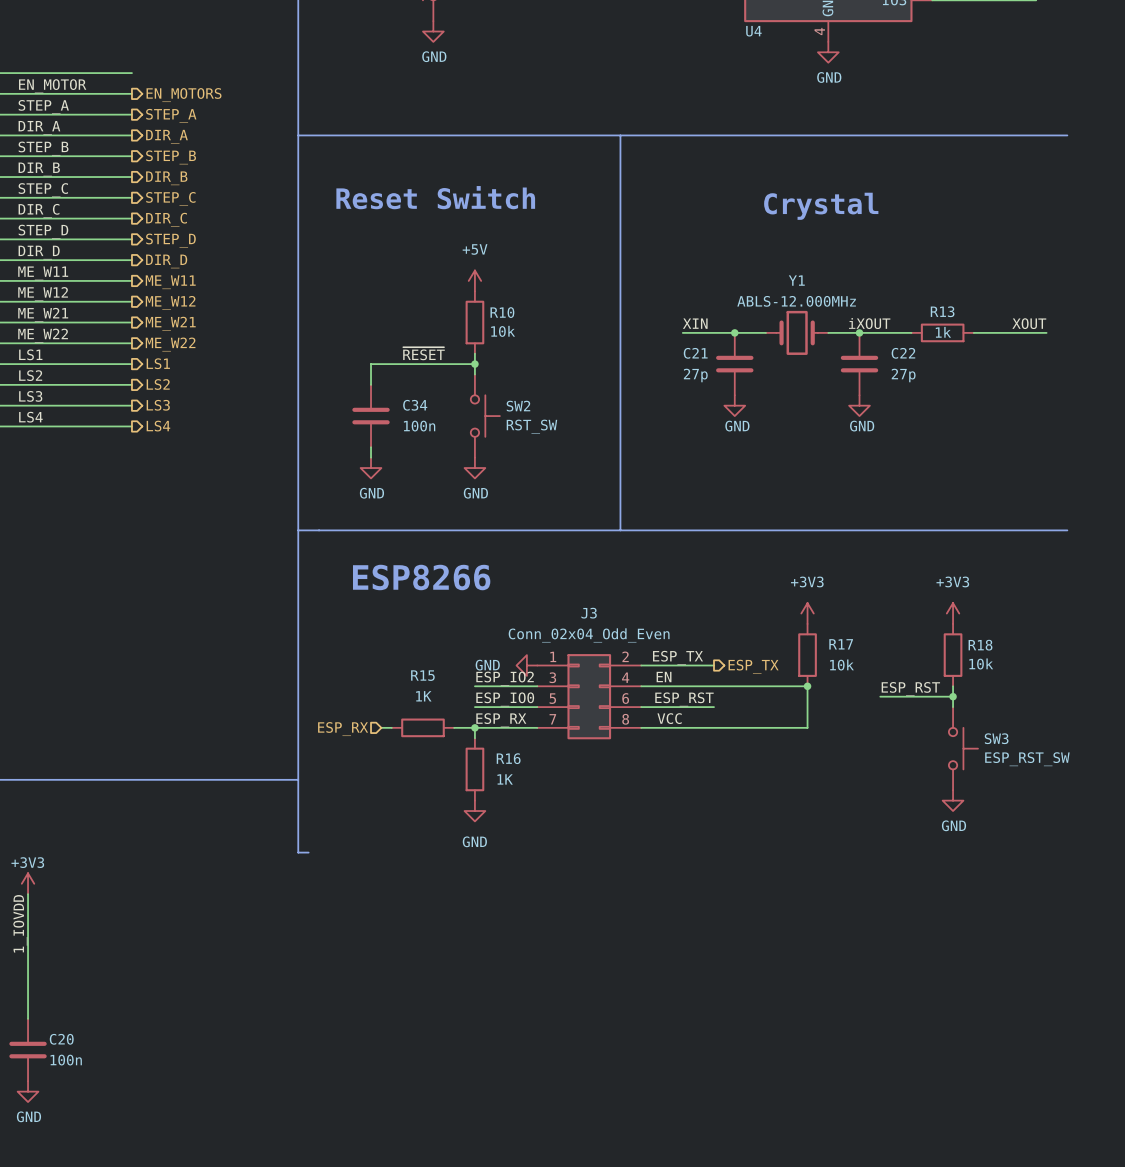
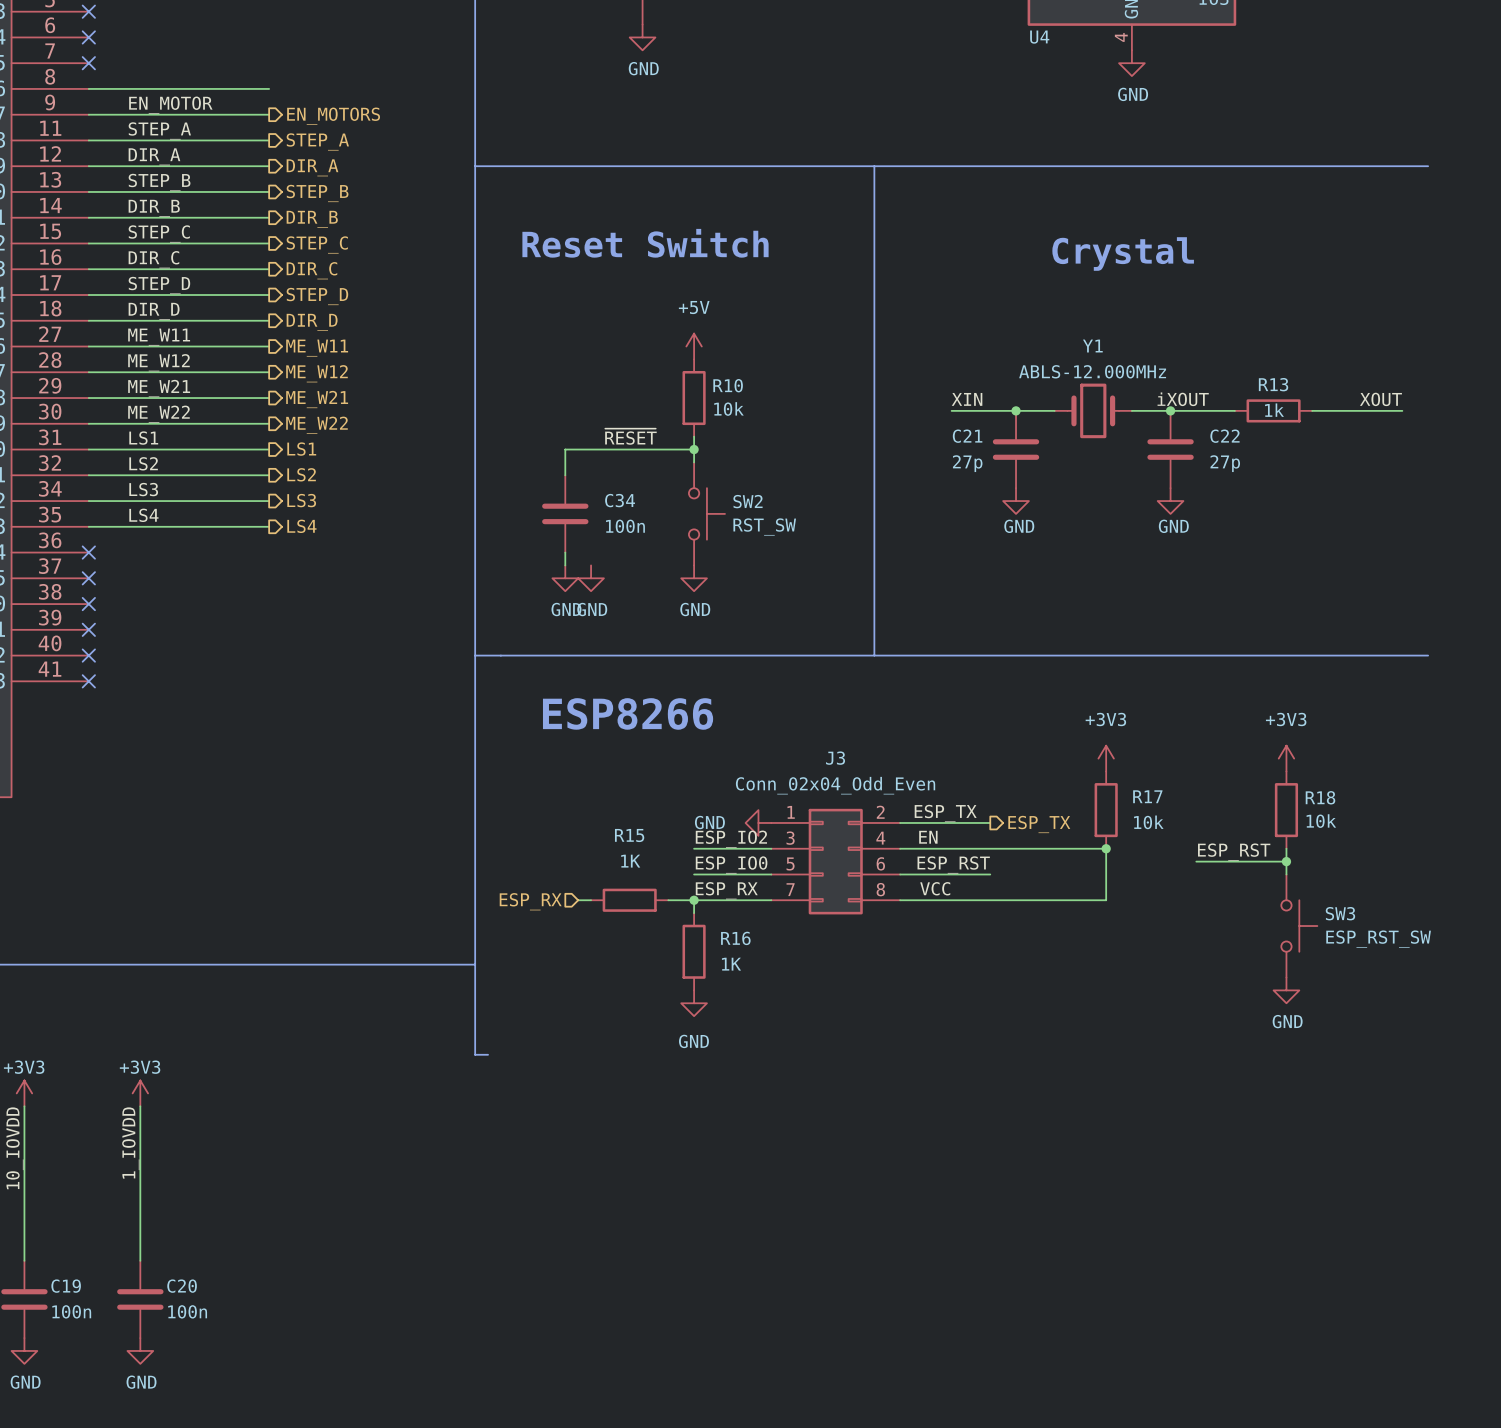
power symbol: none -> GND (591, 578)

